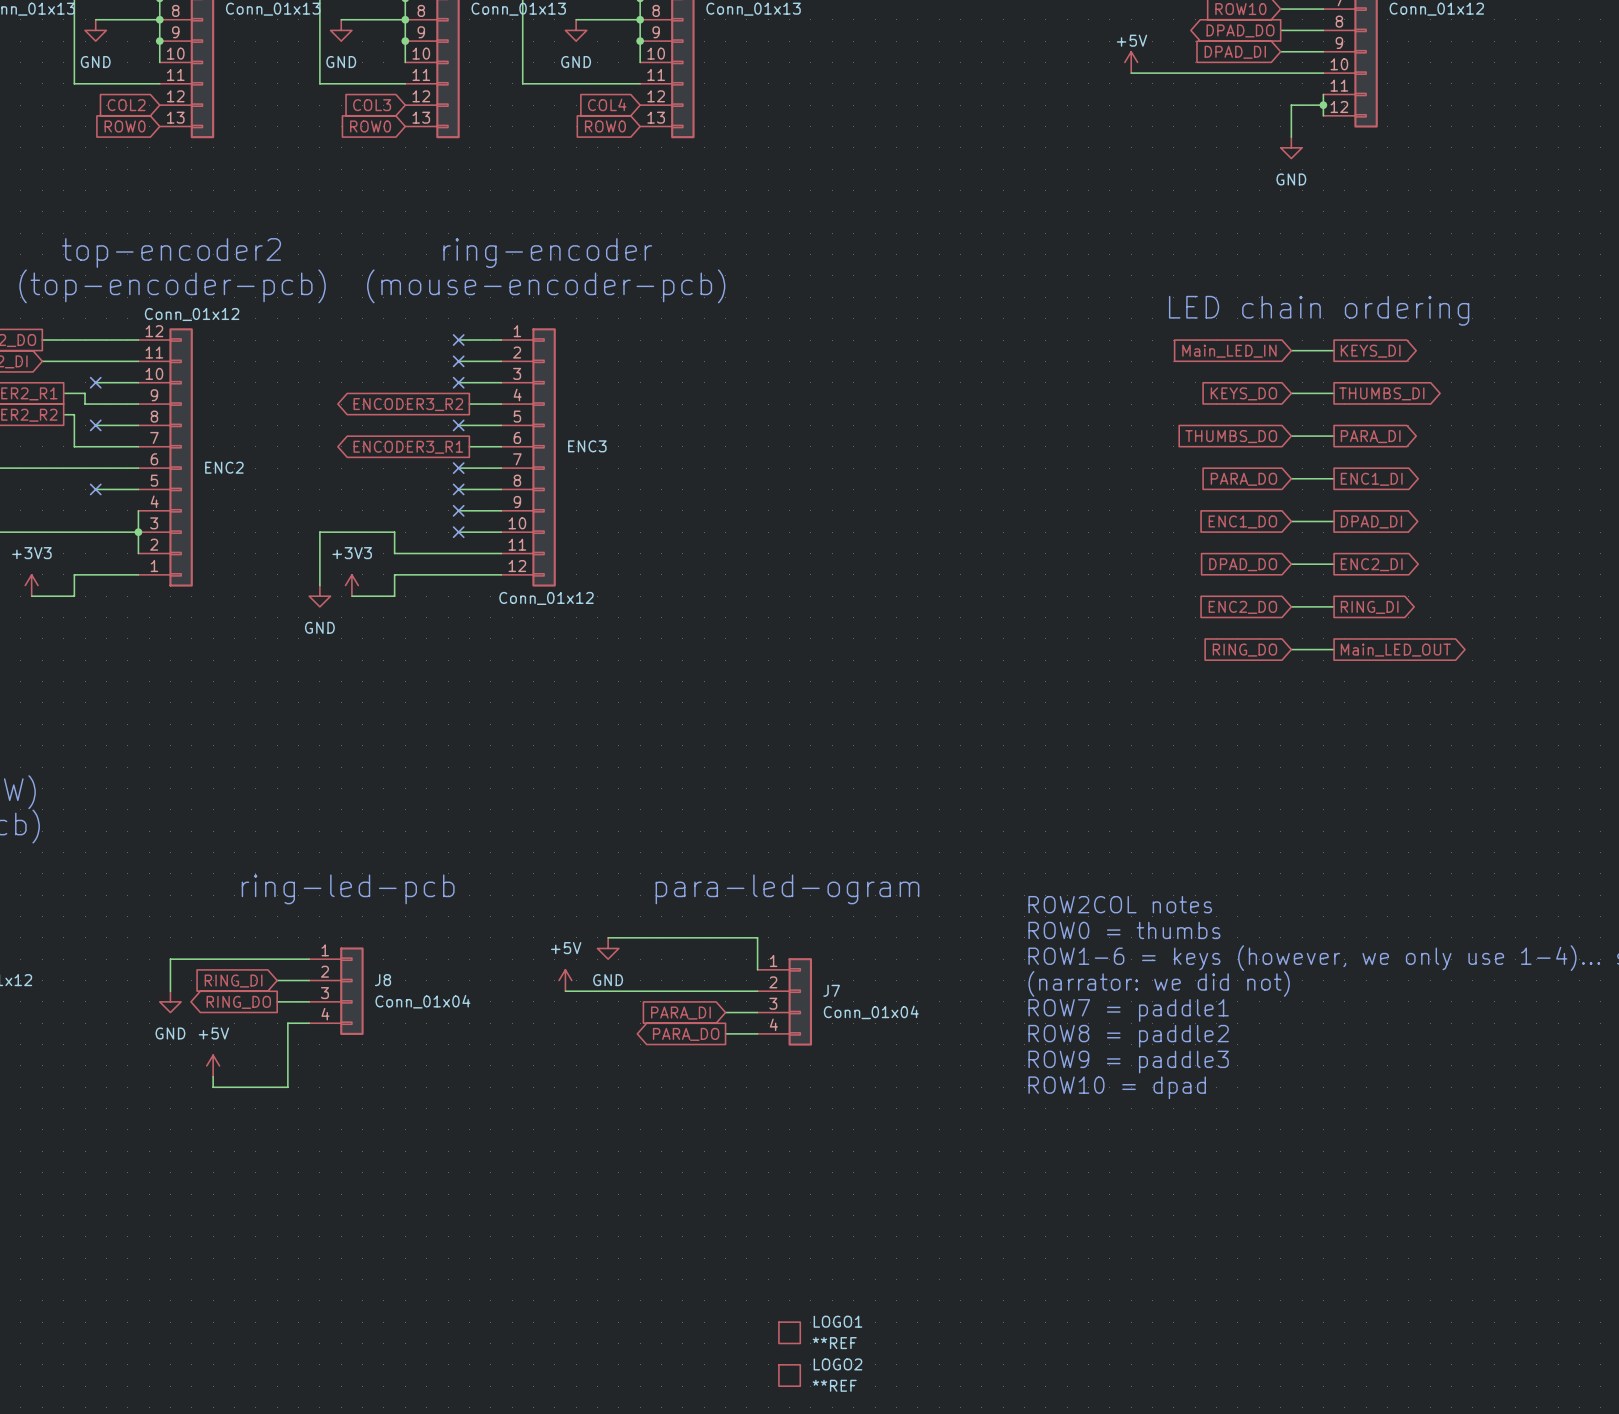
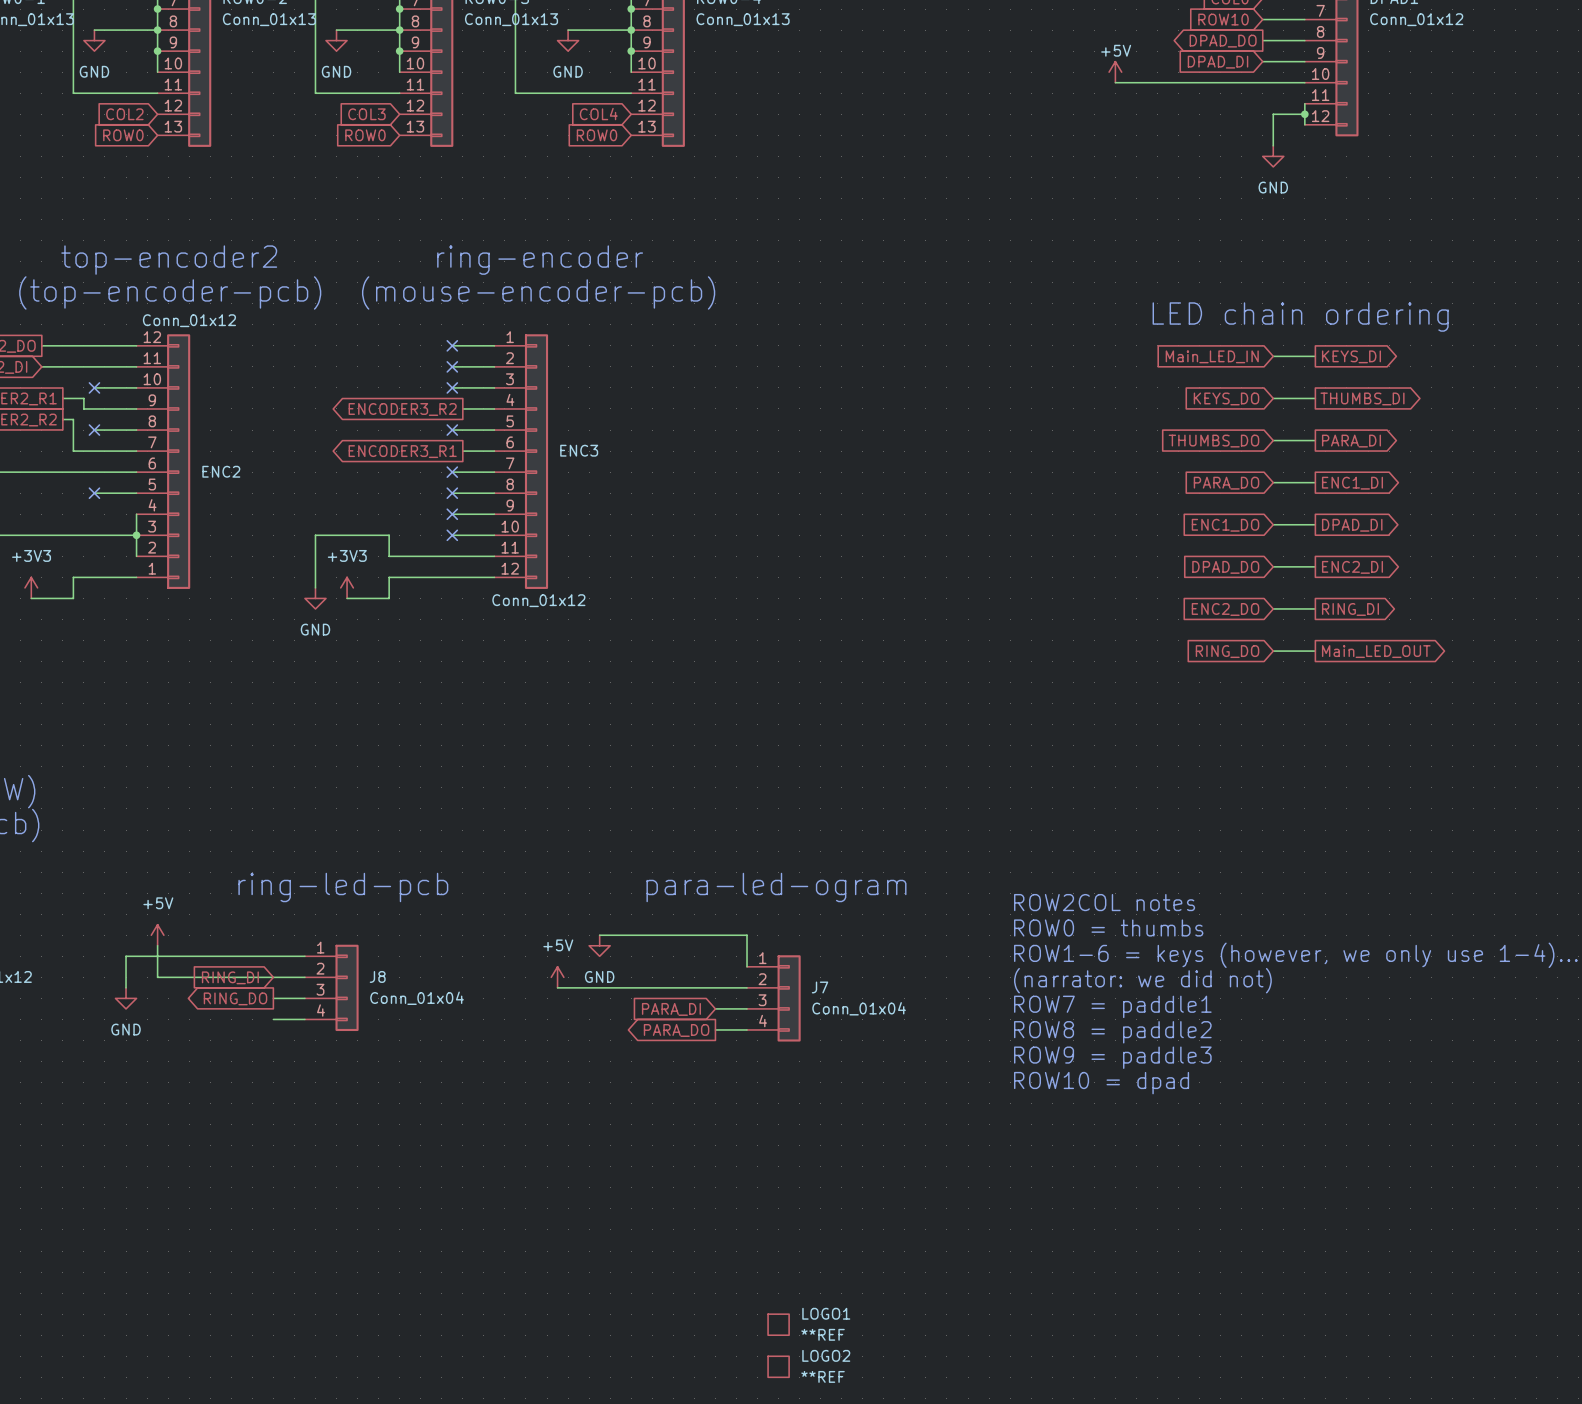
wire: none -> (157, 945) (157, 977) (273, 977)
wire: (170, 959) (170, 991) -> (168, 956) (126, 956) (126, 987)
power symbol position: GND (170, 1001) -> GND (126, 998)
wire: (287, 1023) (287, 1087) (213, 1087) (213, 1076) -> (283, 1019) (273, 1019)
power symbol position: +5V (213, 1065) -> +5V (157, 935)

